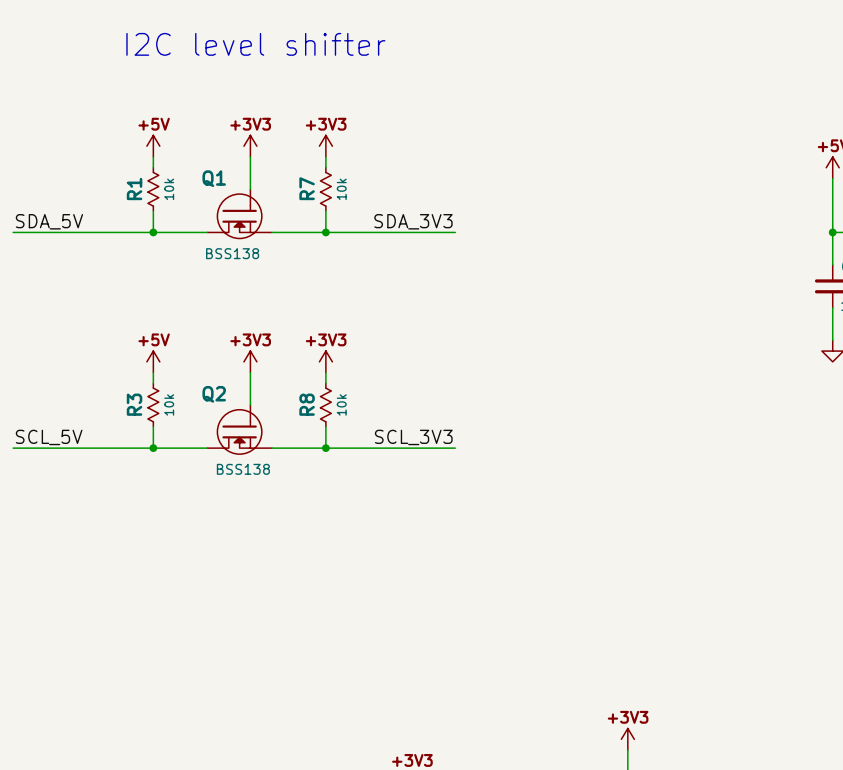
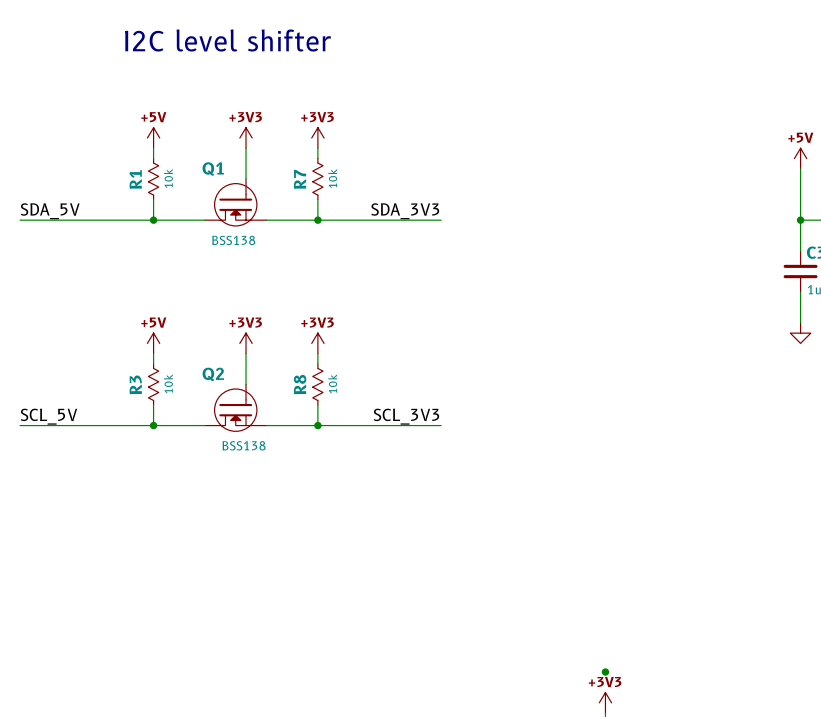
junction: none -> (605, 672)

